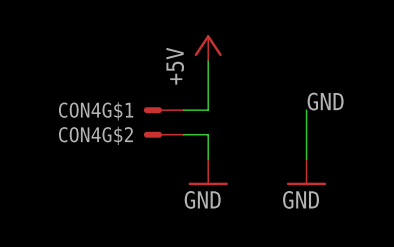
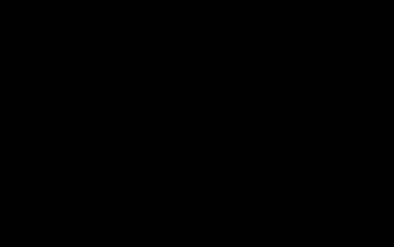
power symbol: +5V (208, 48) -> none
wire: (208, 60) (208, 110) (183, 110) -> none
label: GND (325, 101) -> none
CON4G$1: (163, 110) -> none
wire: (306, 110) (306, 159) -> none
CON4G$2: (163, 134) -> none
wire: (183, 134) (208, 134) (208, 159) -> none
power symbol: GND (208, 172) -> none
power symbol: GND (306, 172) -> none

